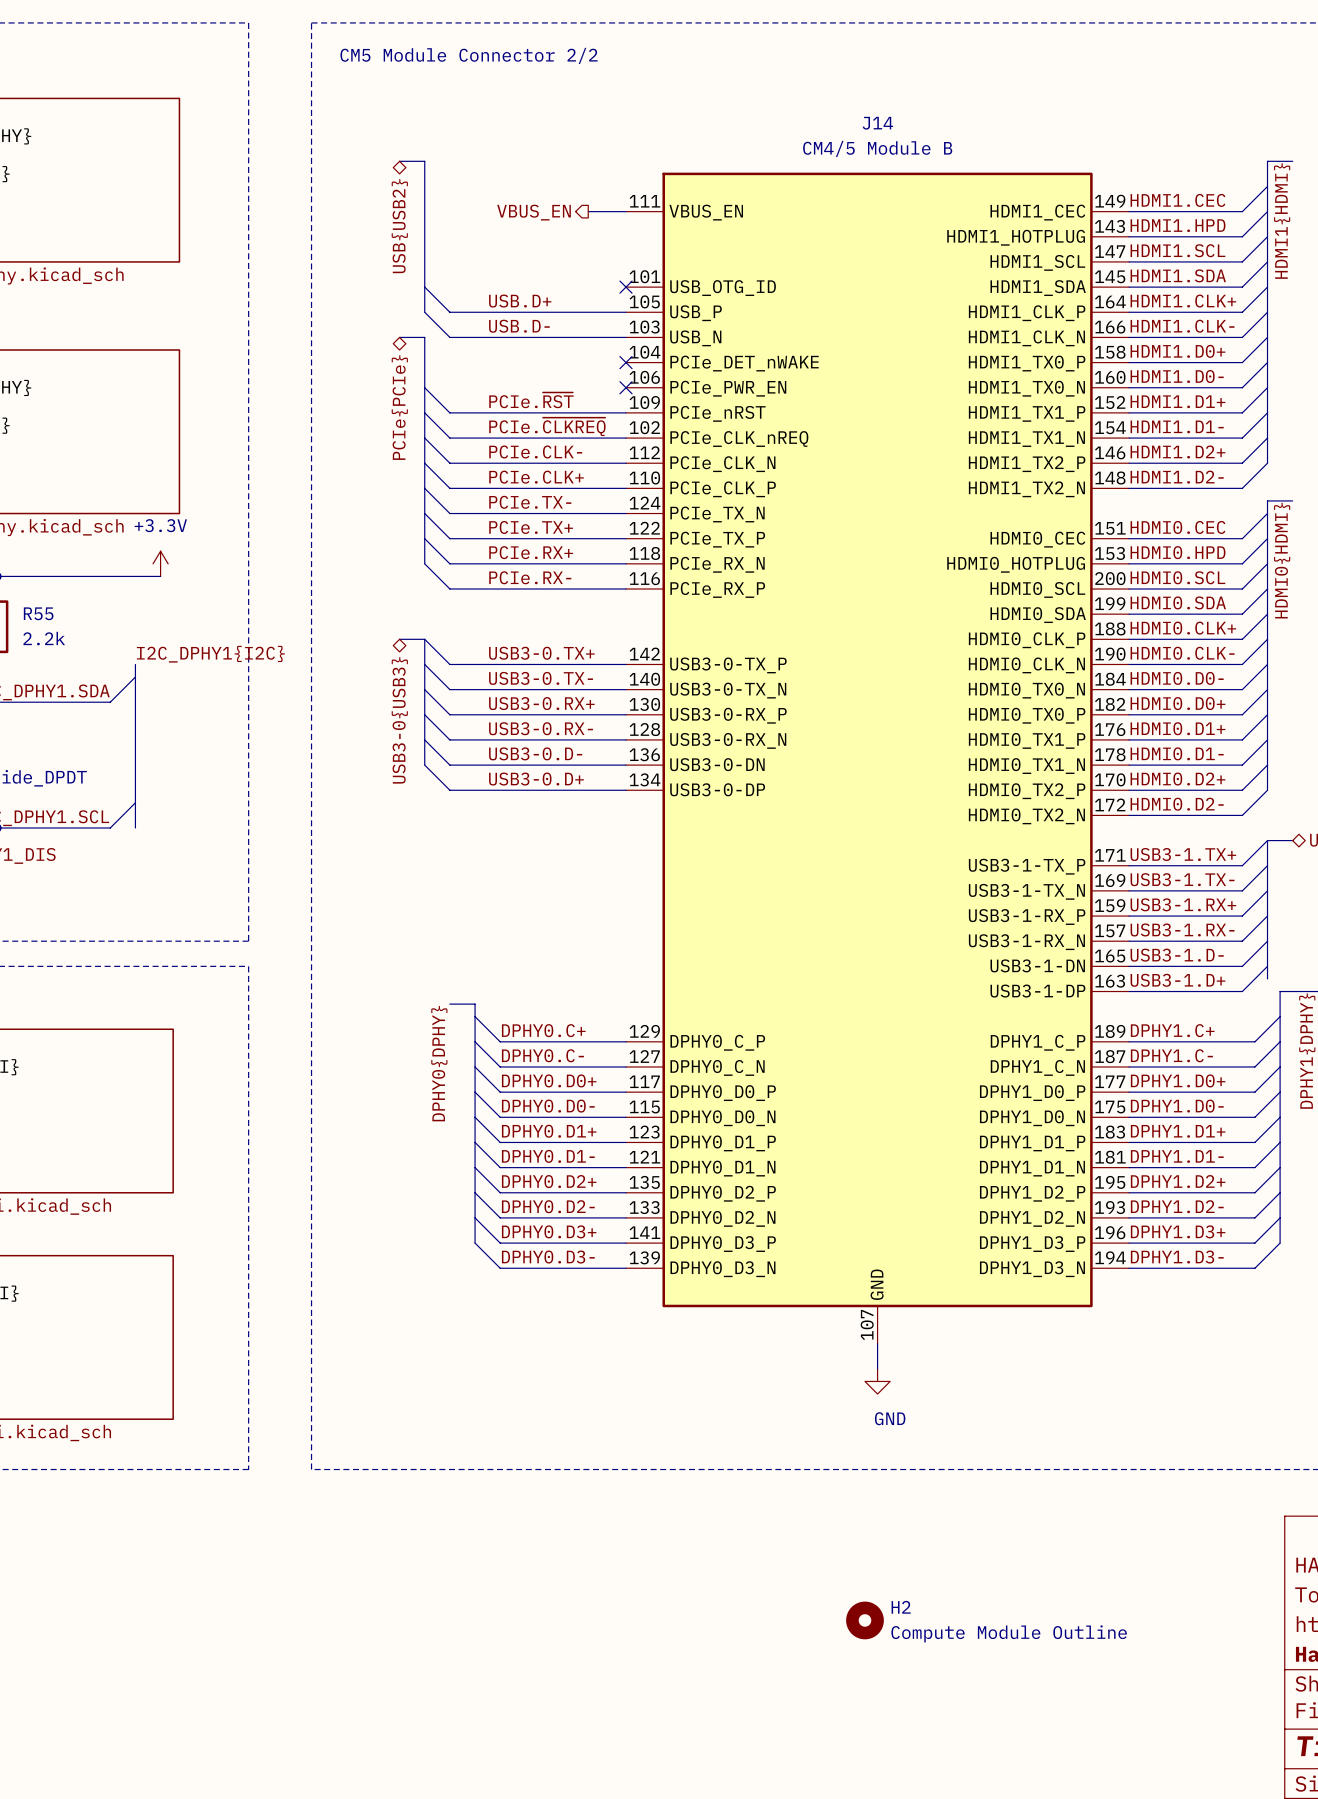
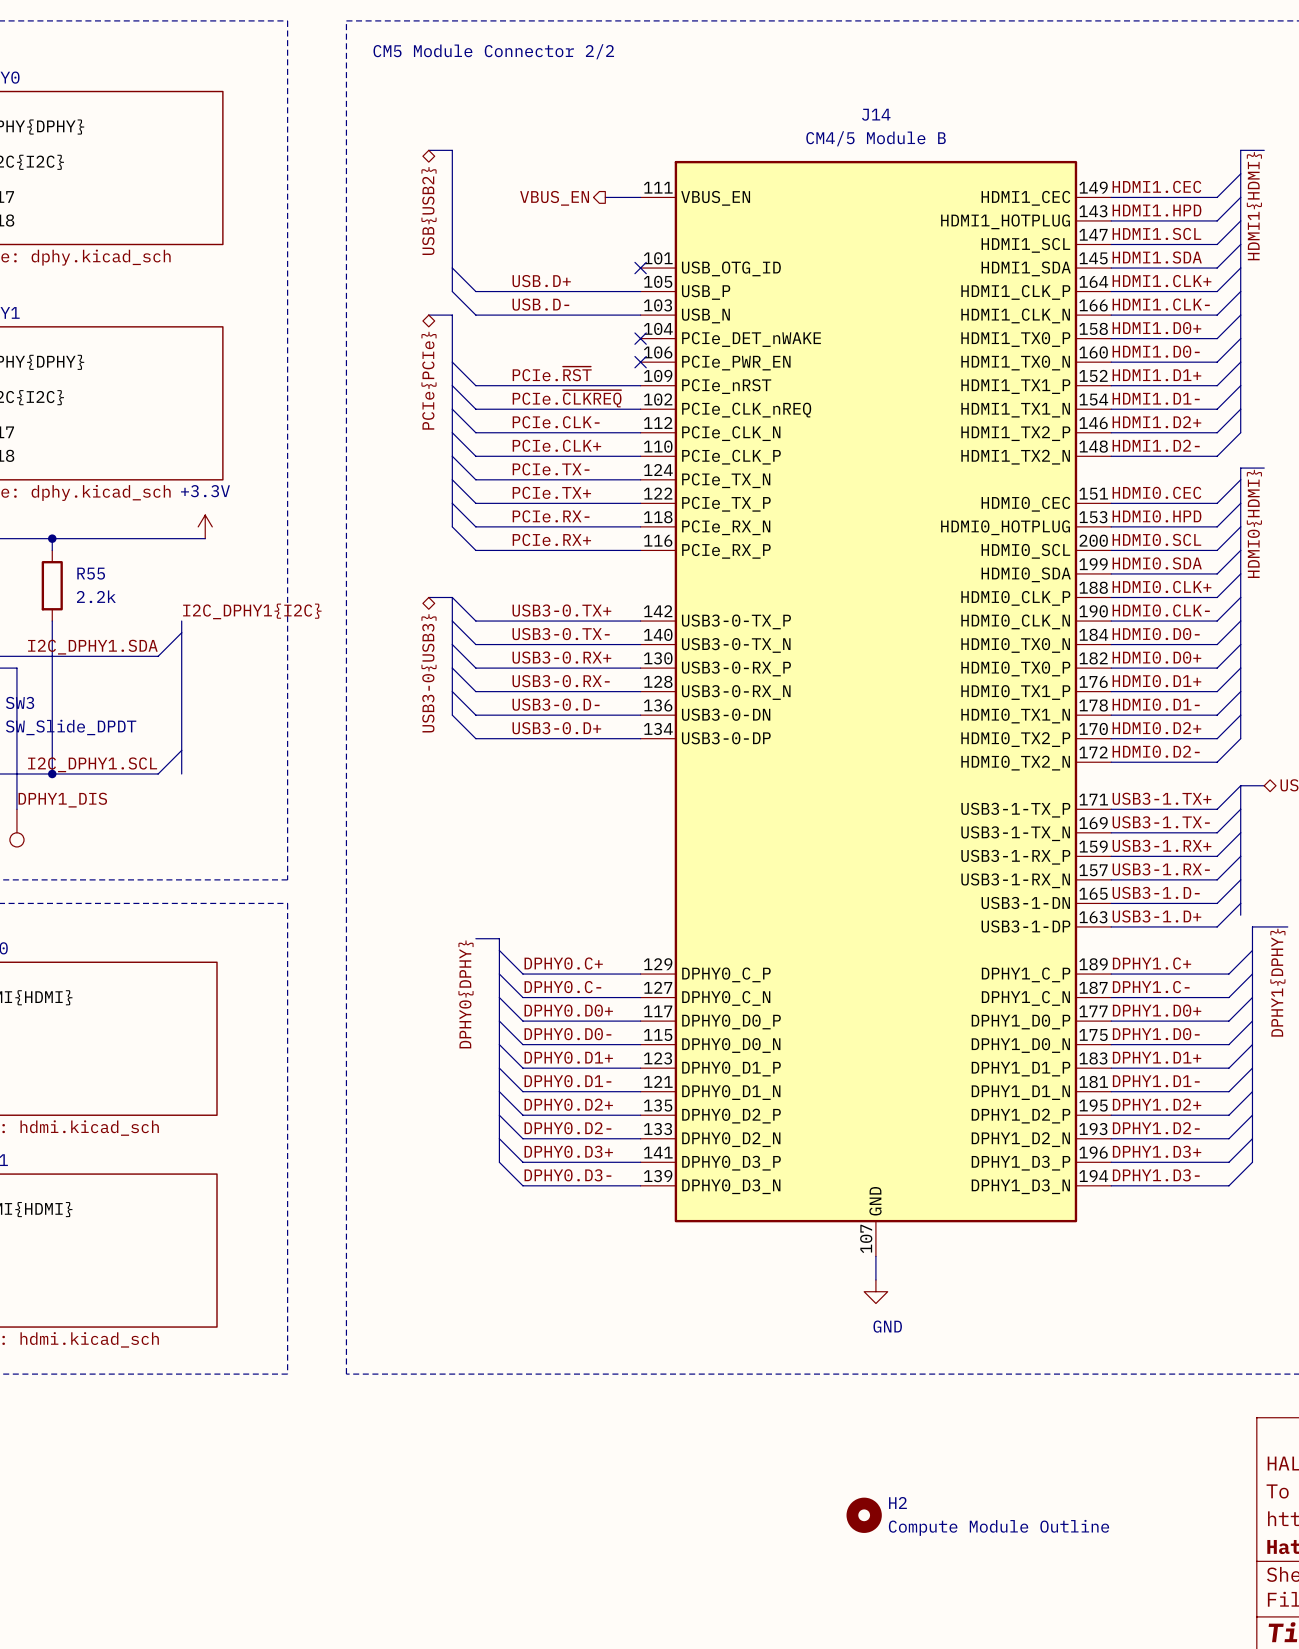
label: PCIe.RX+ (531, 552) -> PCIe.RX- (551, 516)
label: PCIe.RX- (530, 577) -> PCIe.RX+ (551, 539)

